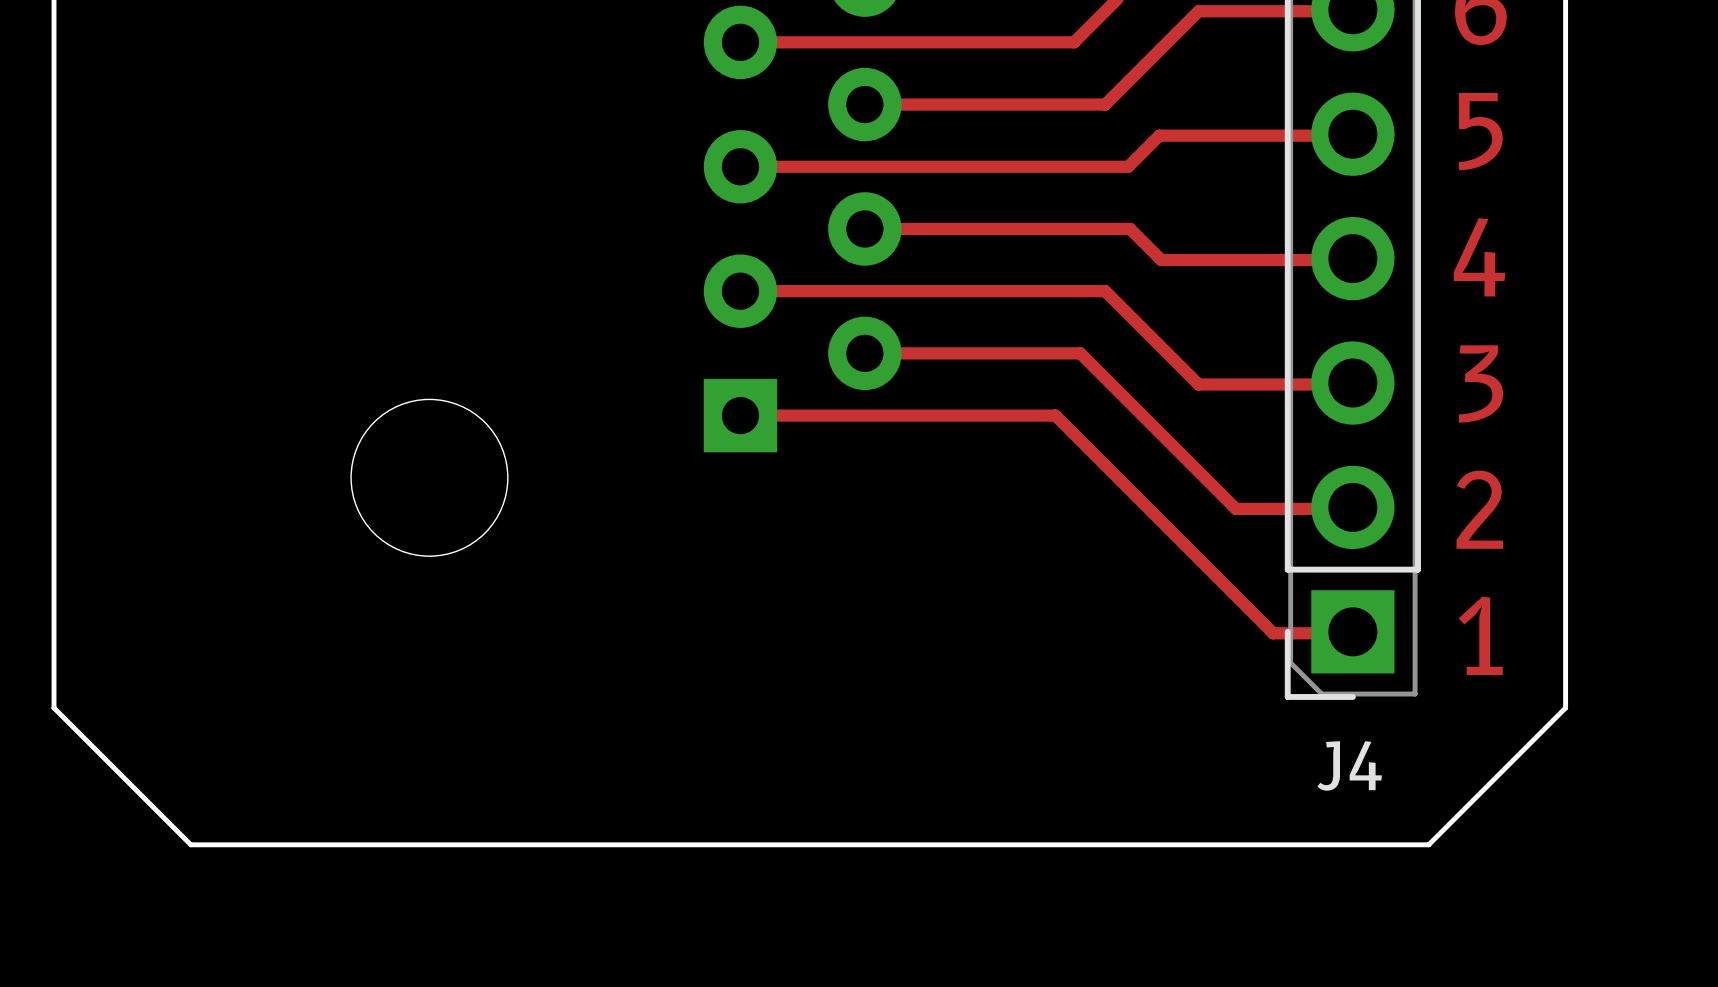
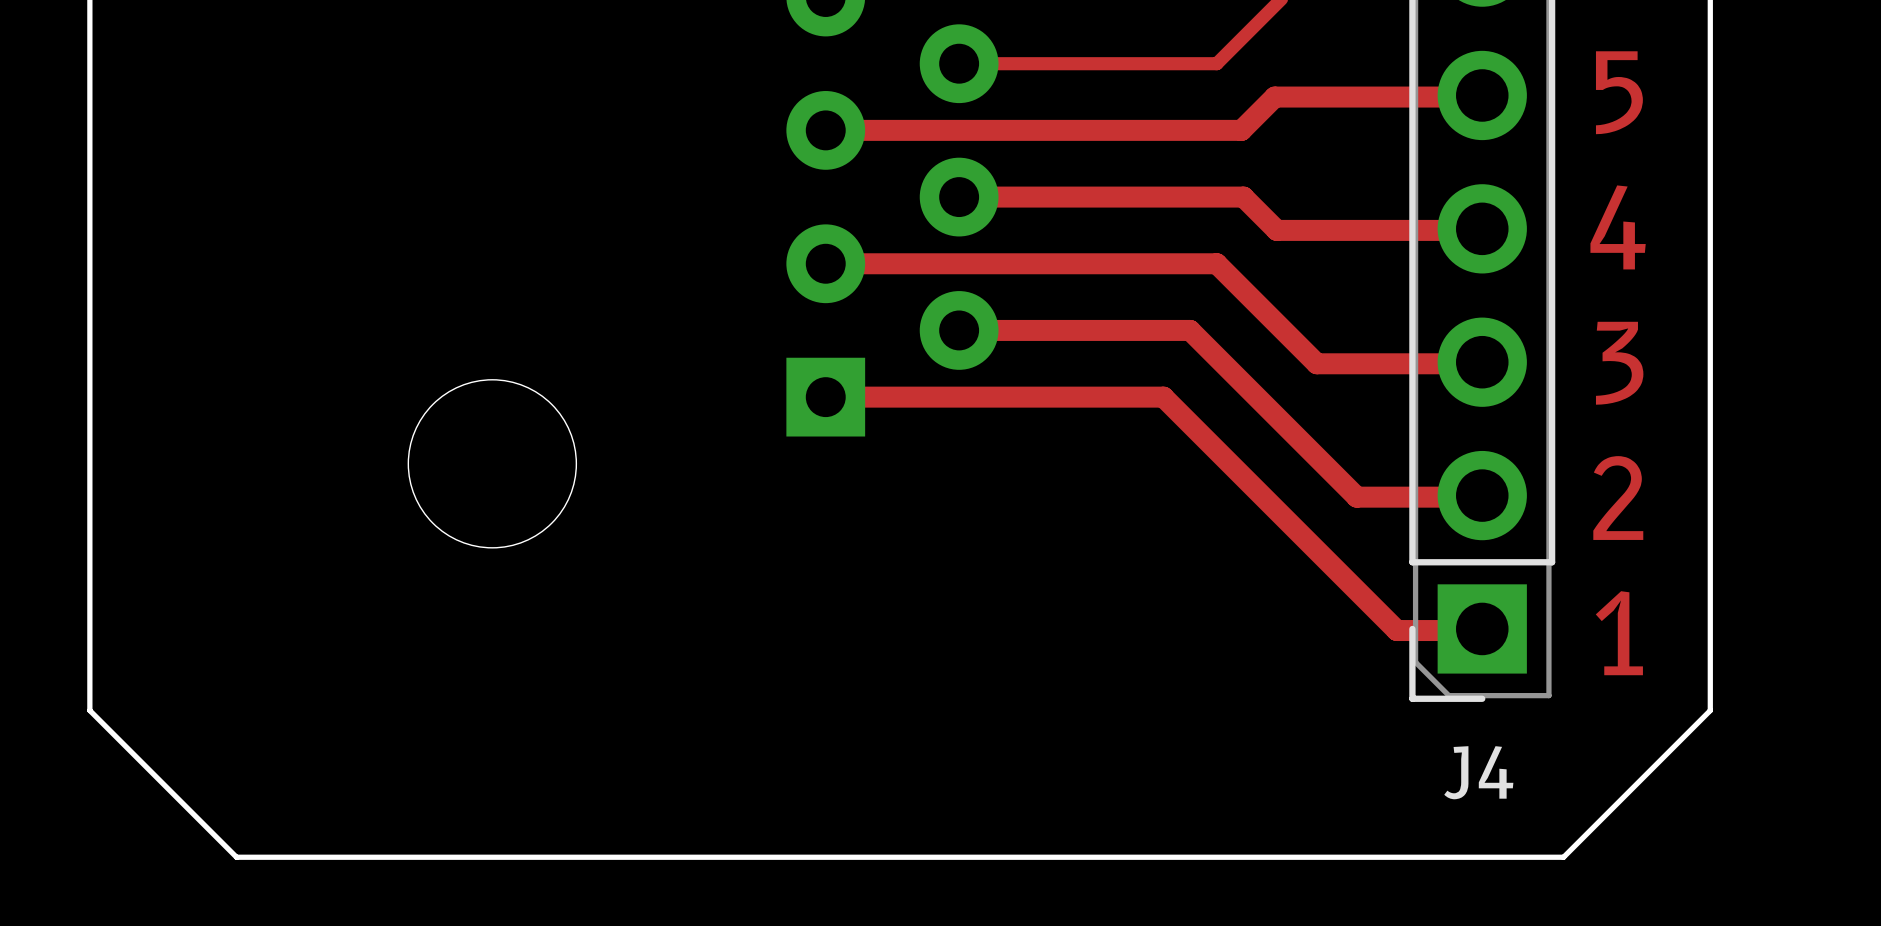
track width: thin (1355, 135) (1159, 135) (1128, 166) (740, 166) -> thick (1484, 97) (1274, 97) (1241, 130) (825, 130)
track width: thin (864, 228) (1130, 228) (1161, 260) (1355, 260) -> thick (959, 197) (1243, 197) (1276, 230) (1484, 230)
track width: thin (740, 291) (1105, 291) (1198, 384) (1355, 384) -> thick (825, 263) (1216, 263) (1316, 363) (1484, 363)
track width: thin (864, 353) (1080, 353) (1235, 508) (1355, 508) -> thick (959, 330) (1190, 330) (1356, 497) (1484, 497)
track width: thin (740, 415) (1055, 415) (1273, 633) (1355, 633) -> thick (825, 397) (1163, 397) (1396, 630) (1484, 630)

